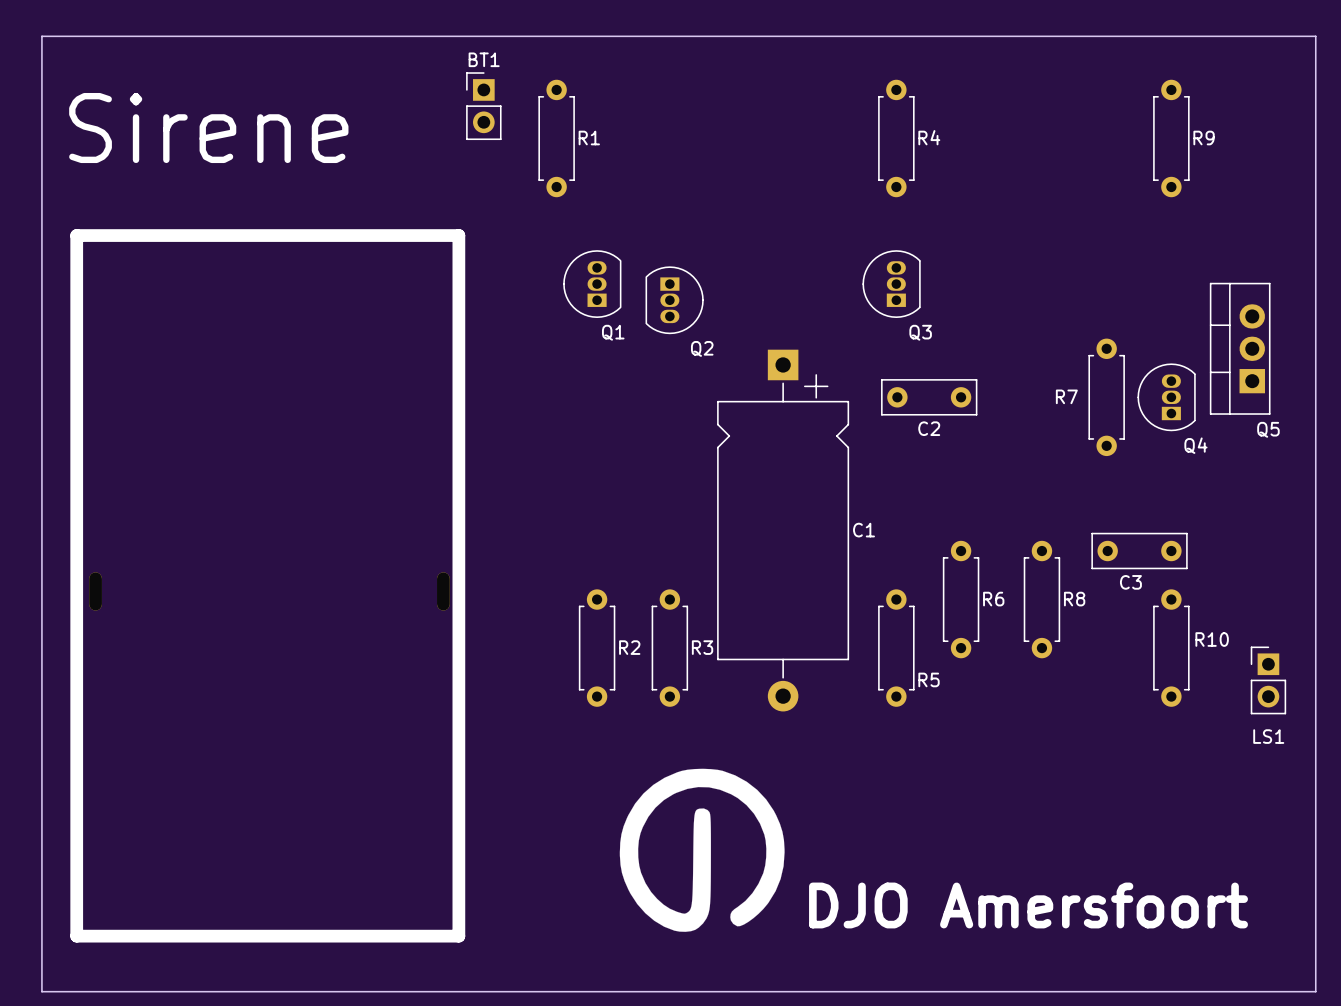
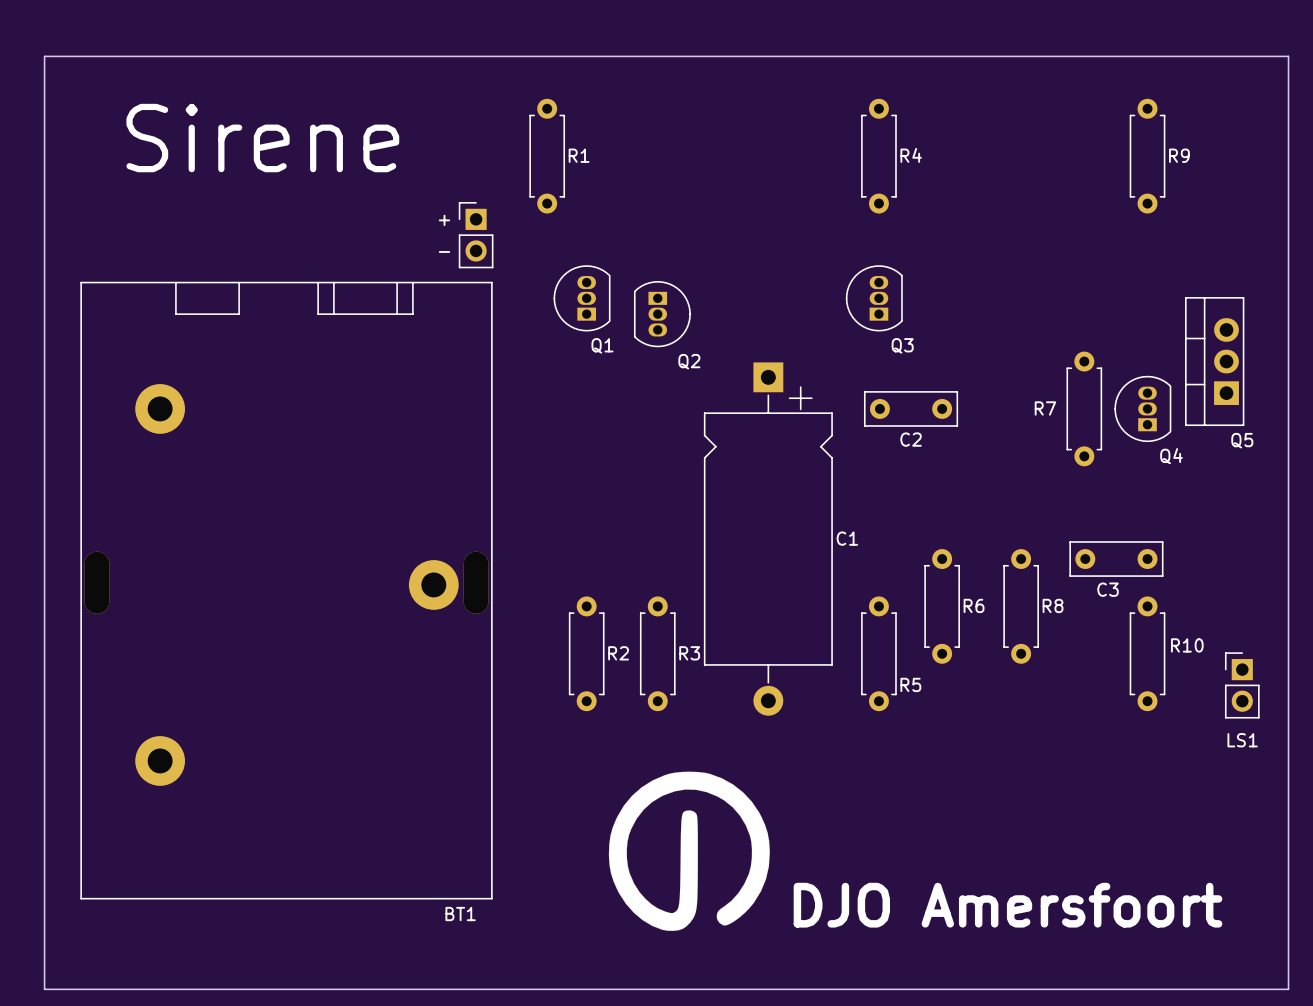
BT1 name position: BT1 (484, 59) -> BT1 (460, 914)
BT1 footprint: [466, 72, 502, 141] -> [80, 202, 494, 900]
text position: Sirene (208, 128) -> Sirene (262, 138)
line: (76, 235) (458, 235) (458, 936) (76, 936) (76, 235) -> none
part: (95, 591) -> none
part: (443, 591) -> none

